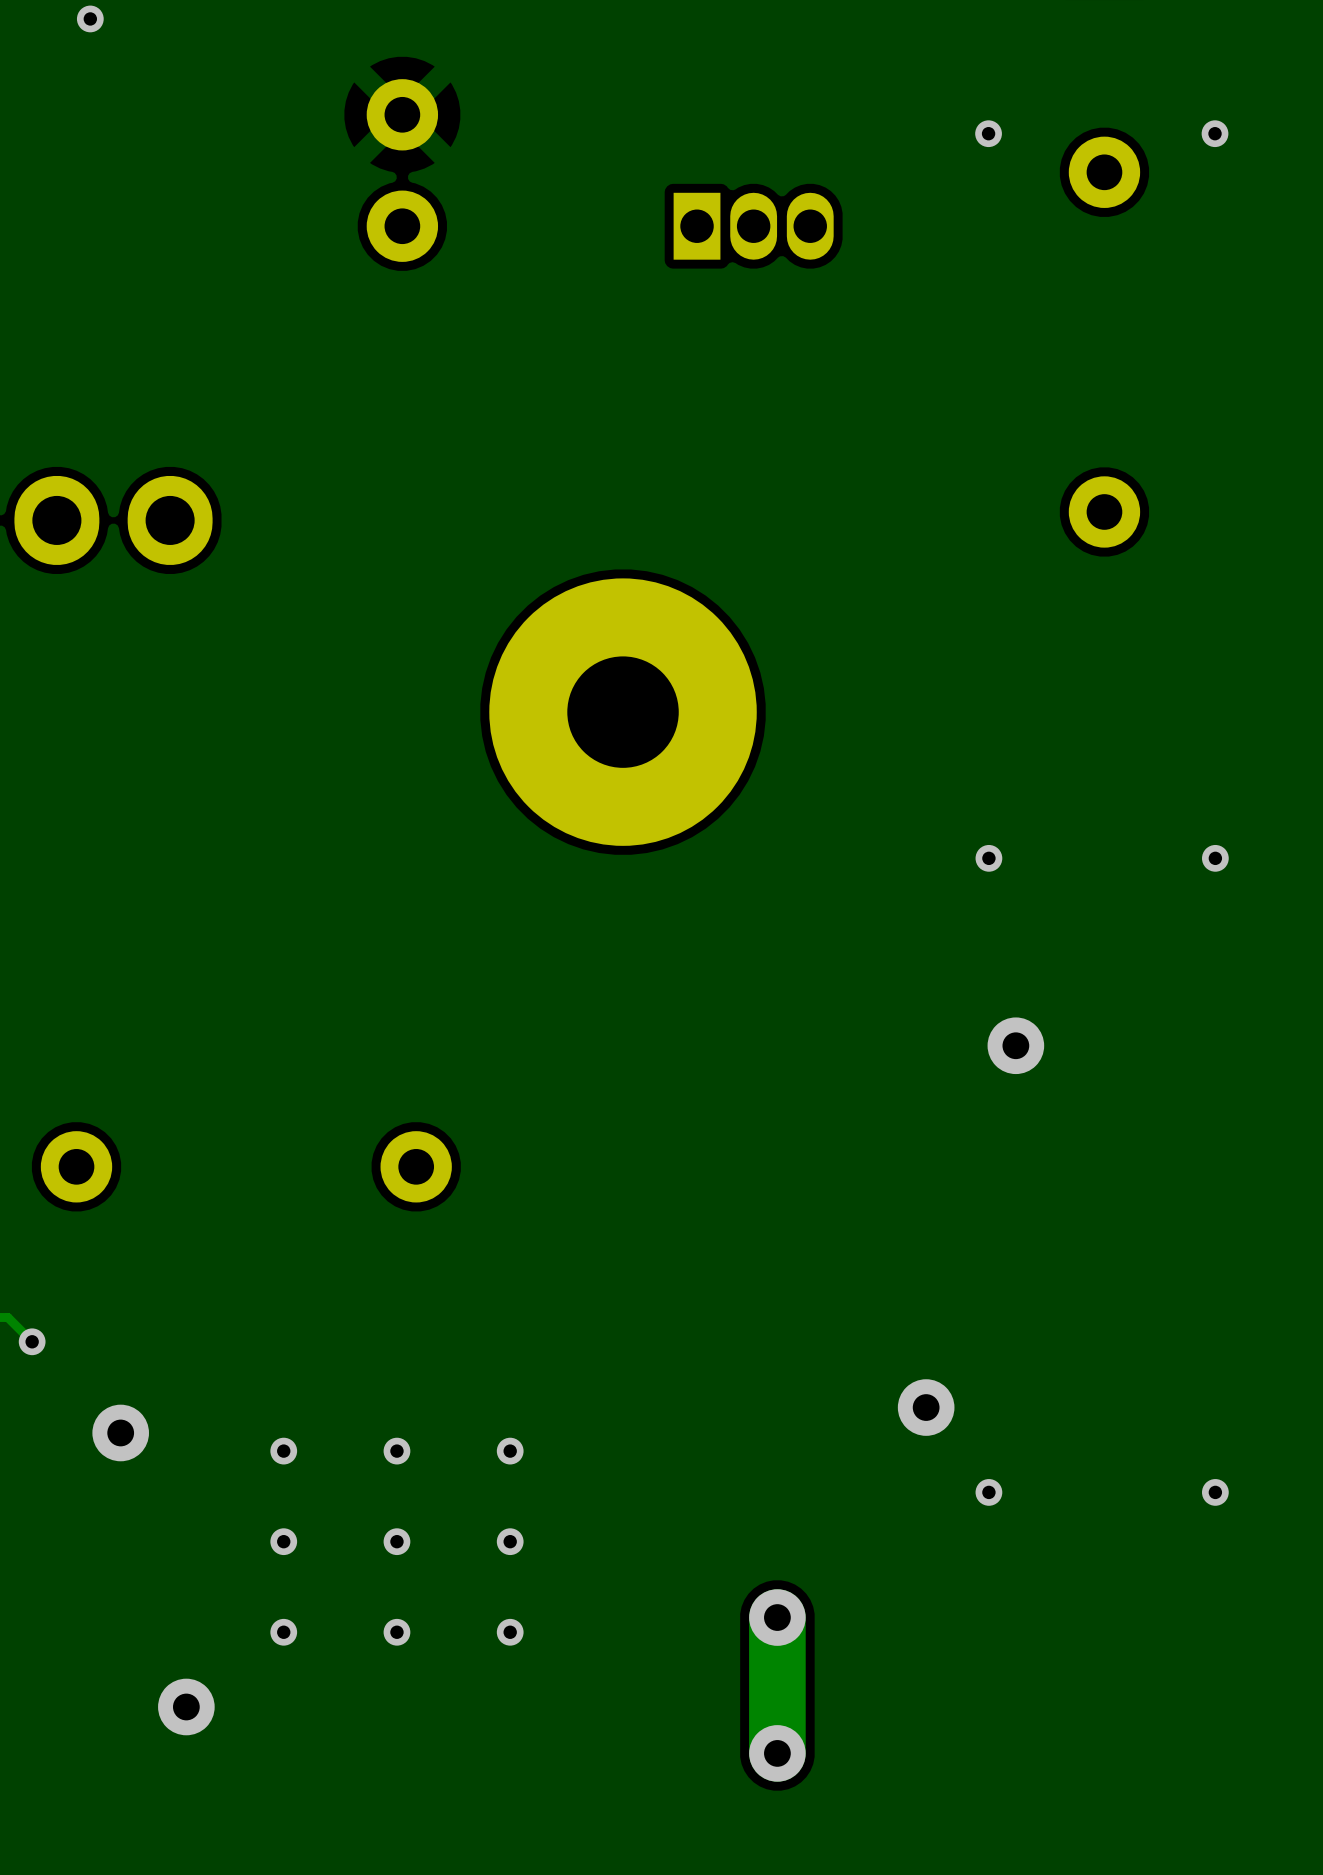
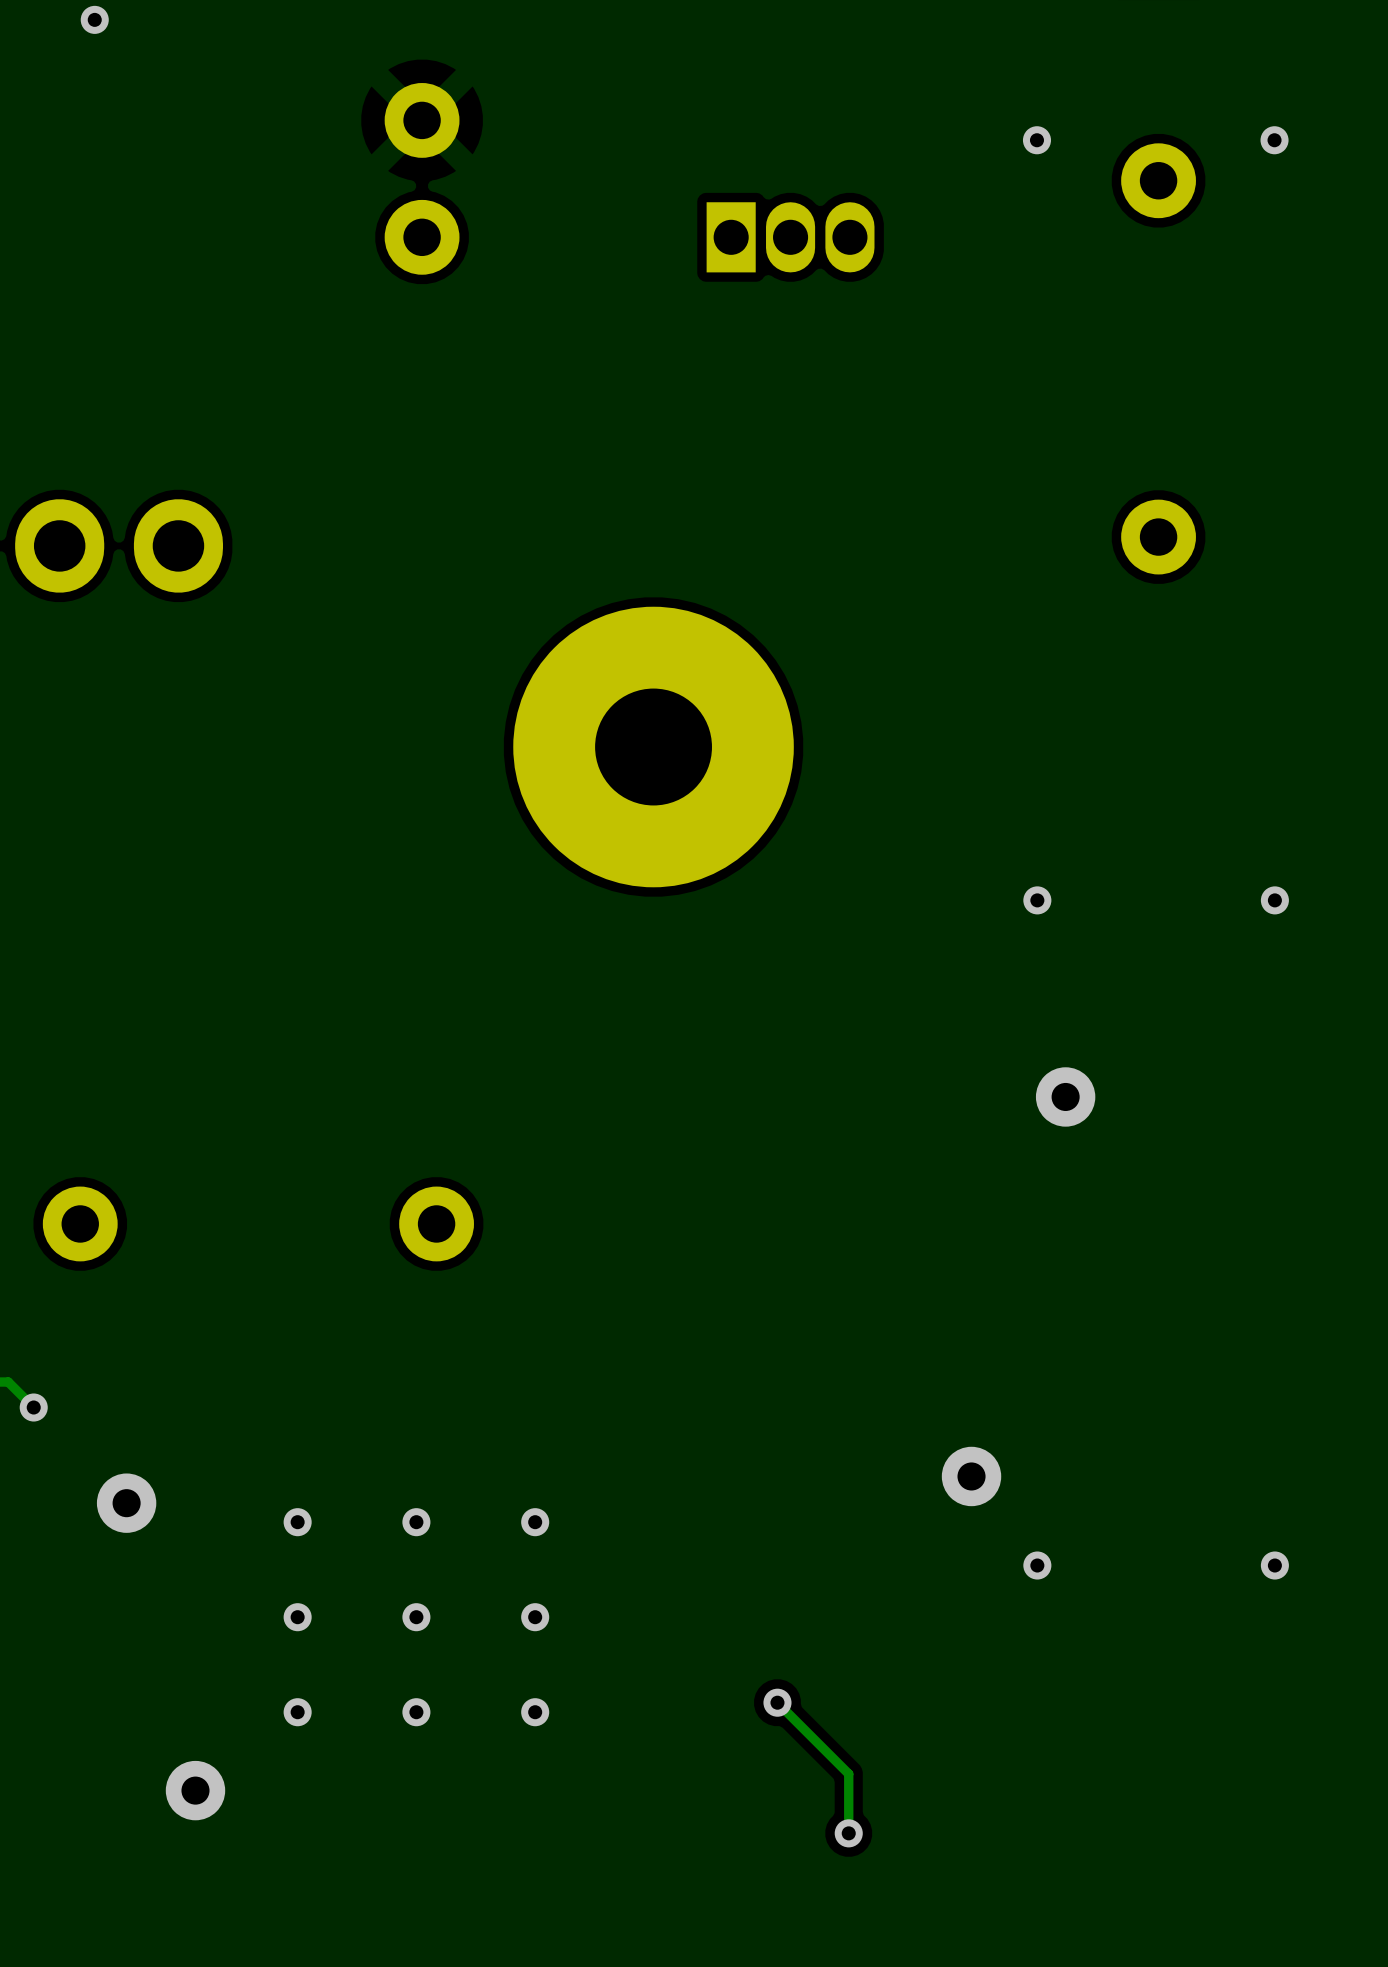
via size: [749, 1589, 806, 1646] -> [763, 1688, 792, 1717]
track: (777, 1617) (777, 1753) -> none
track: none -> (777, 1702) (848, 1773) (848, 1833)
via size: [749, 1725, 806, 1782] -> [834, 1819, 863, 1848]

